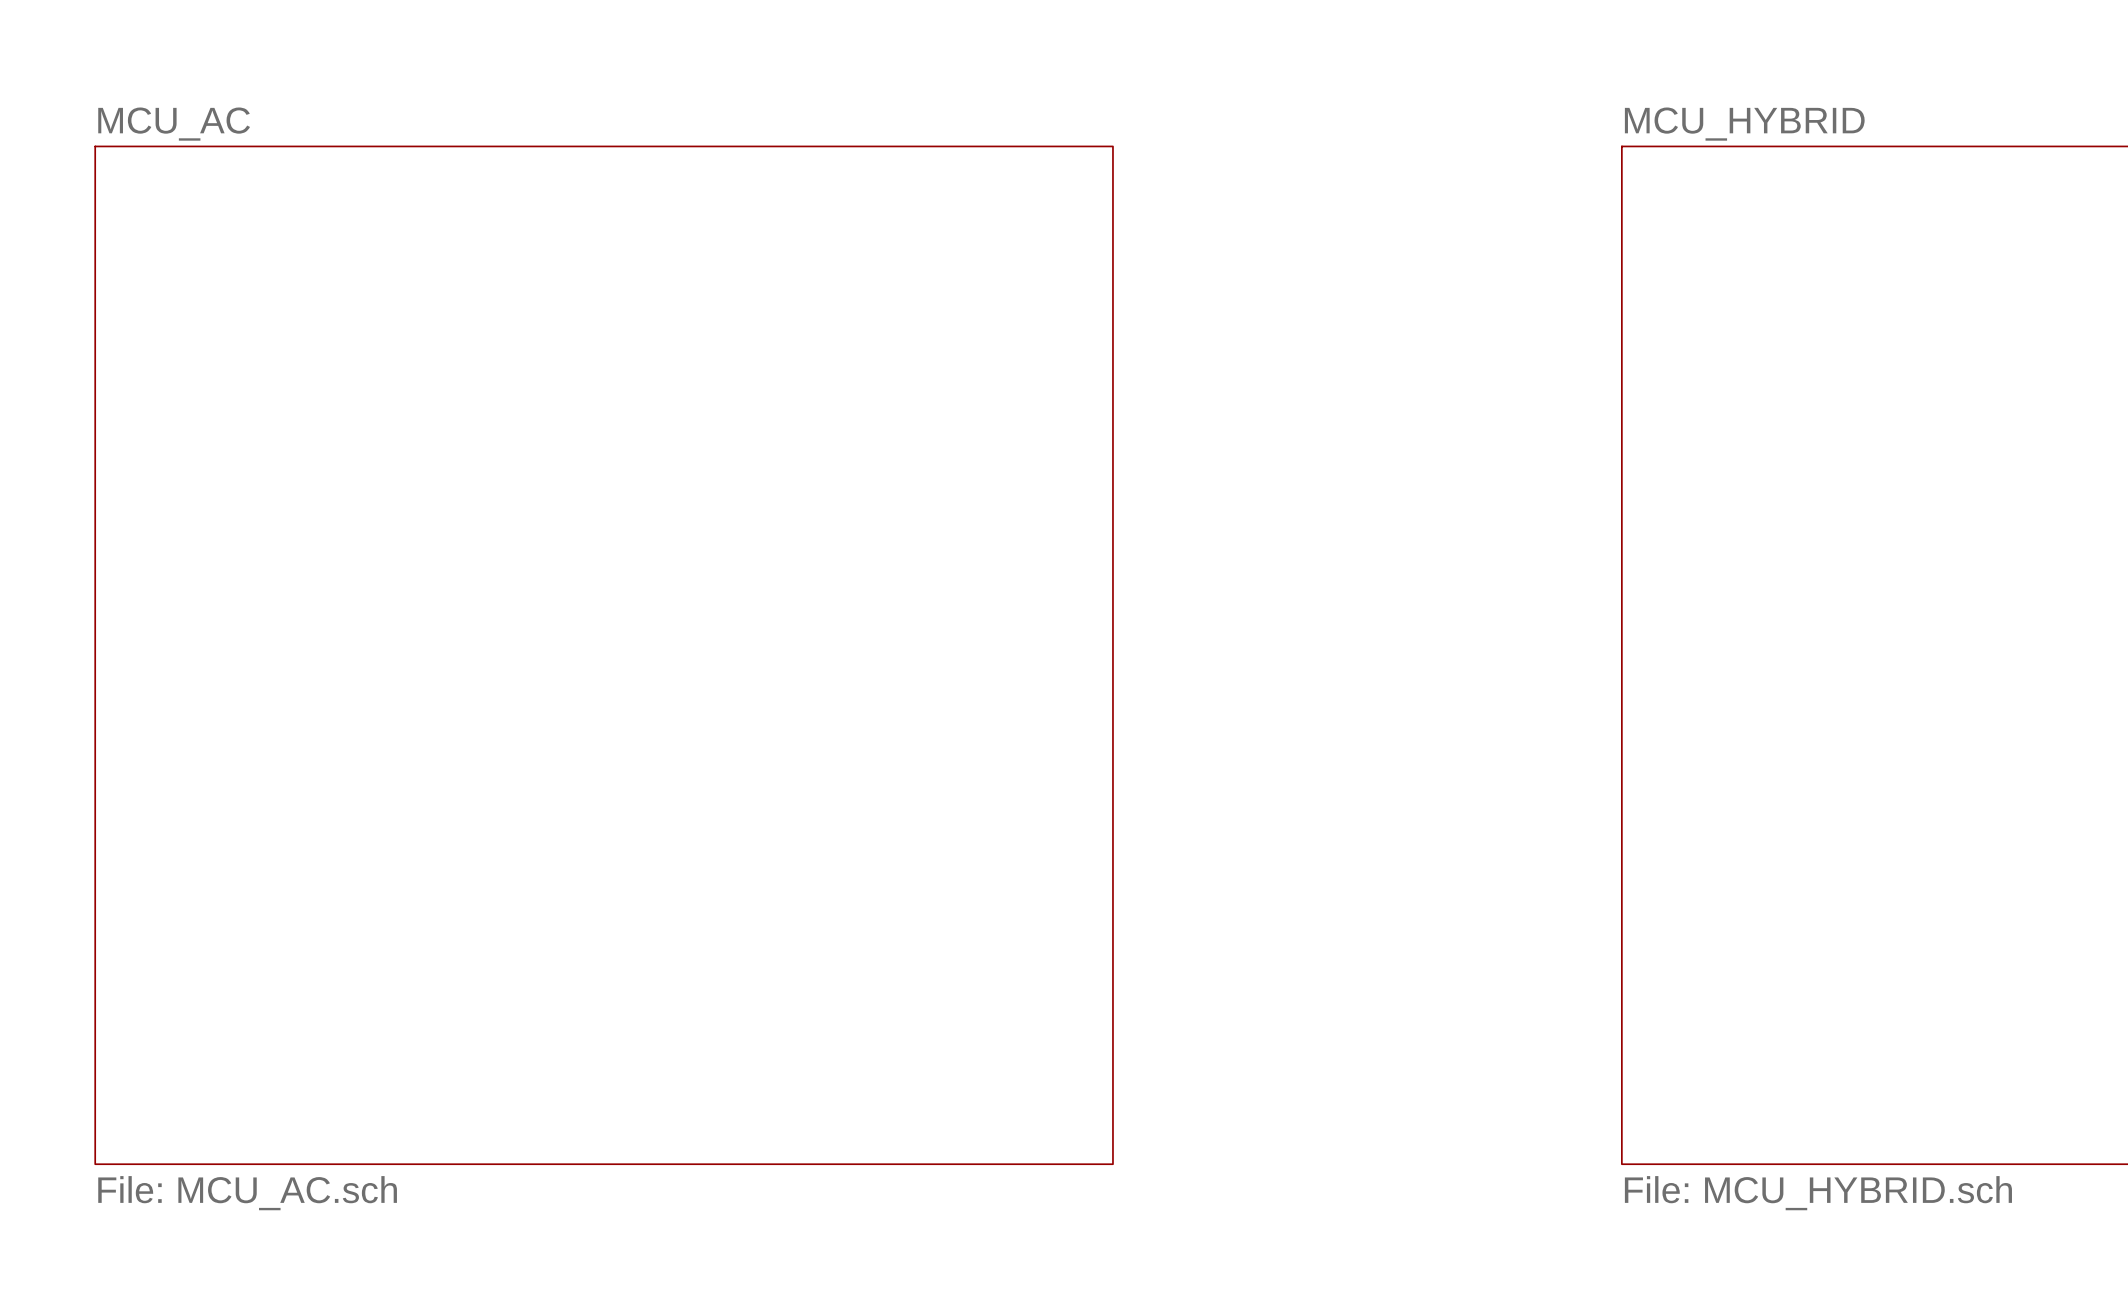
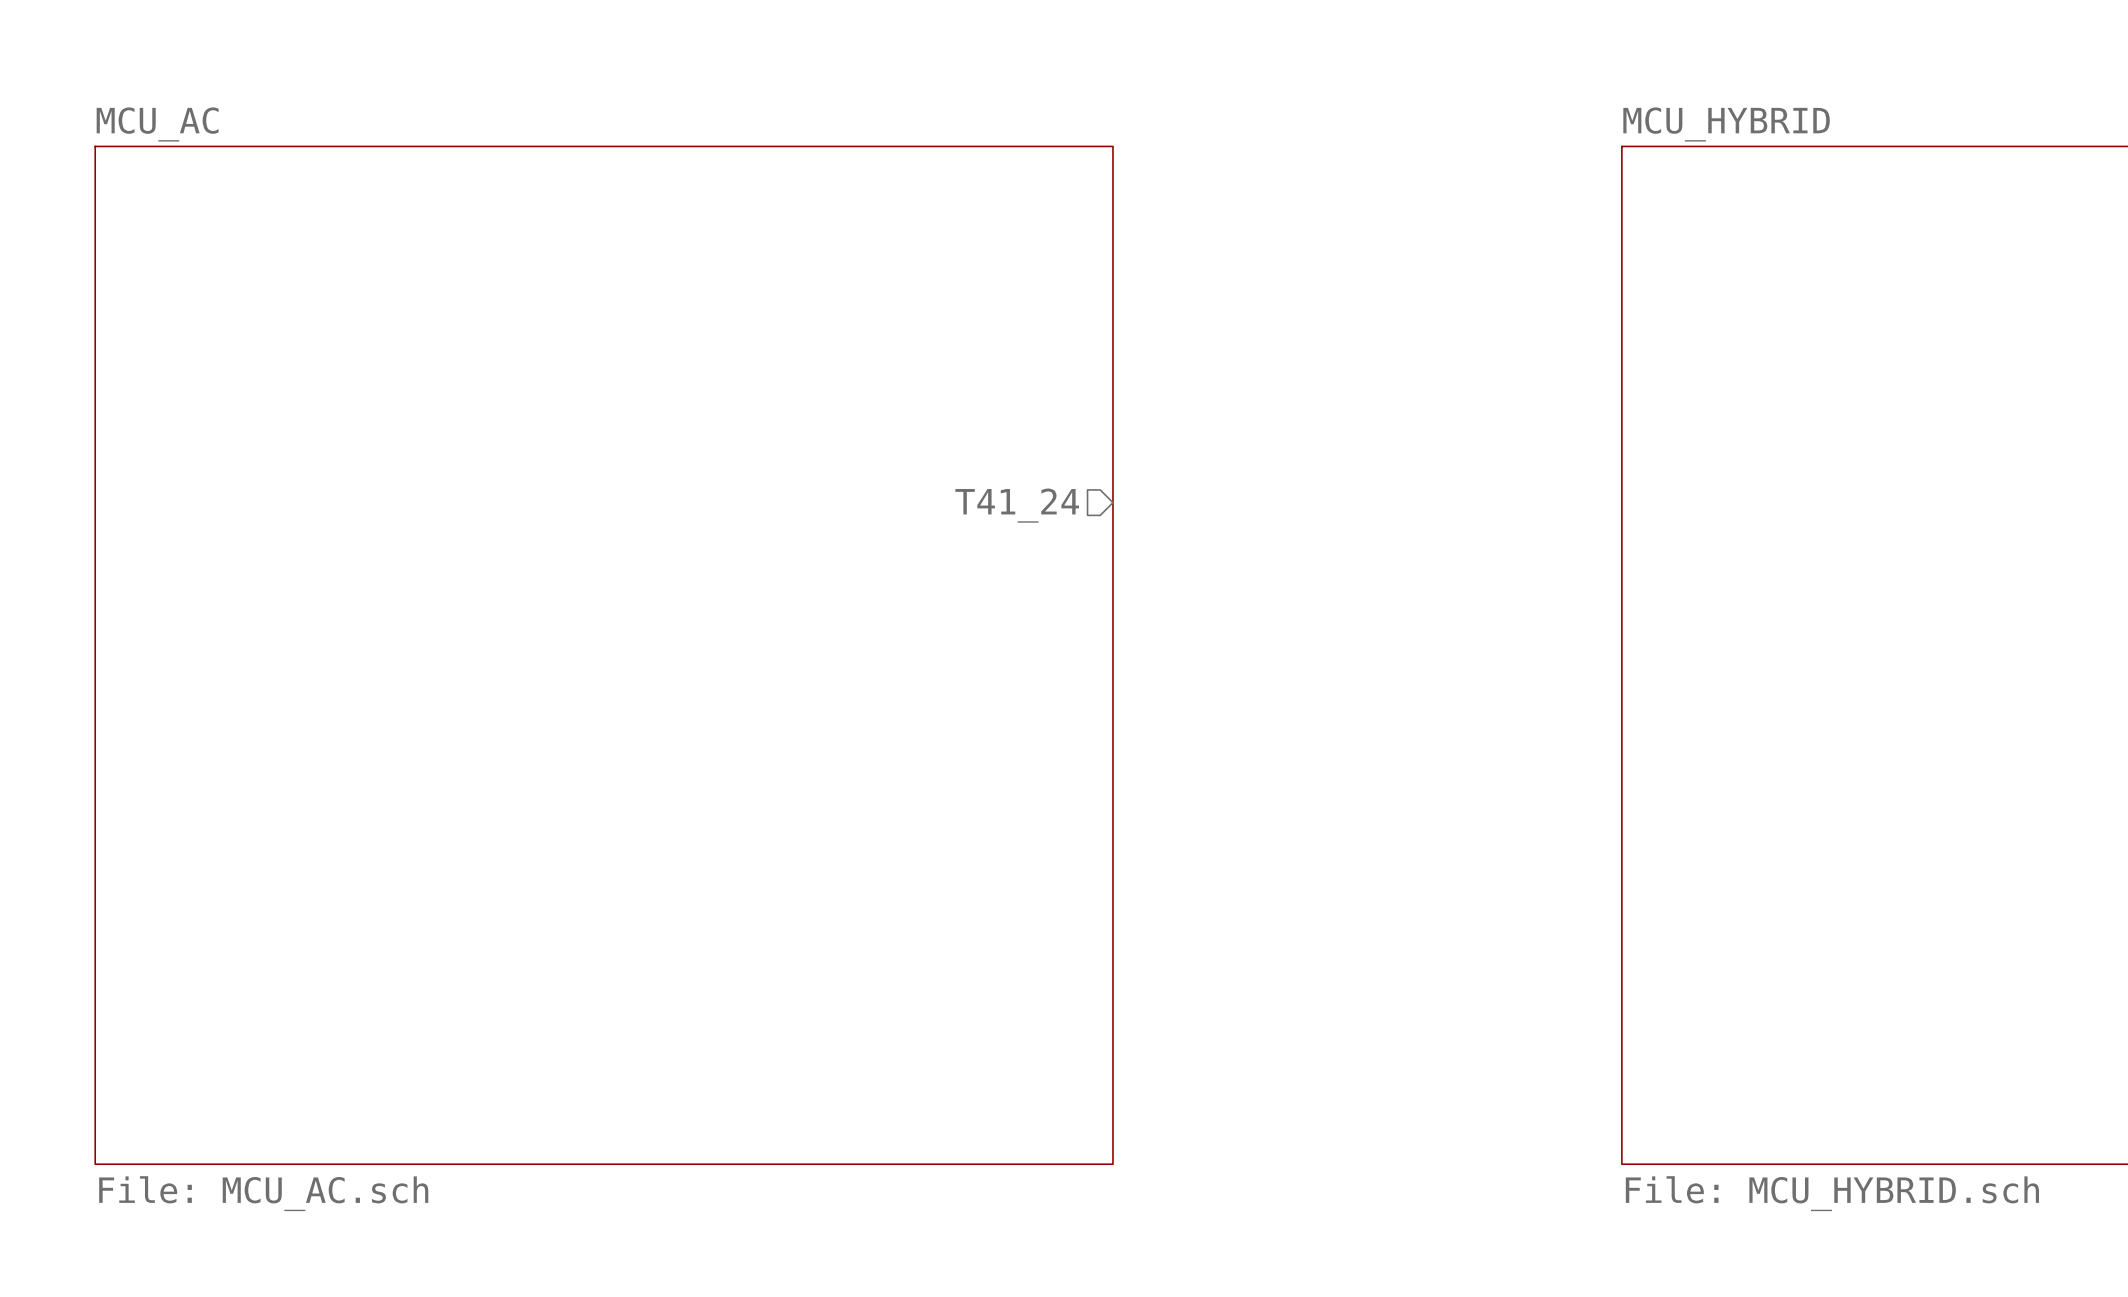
sheet pin: none -> T41_24 (1017, 505)

